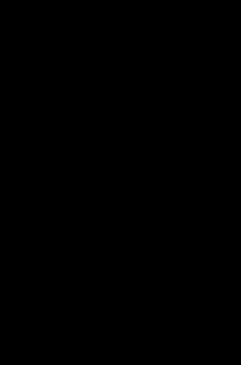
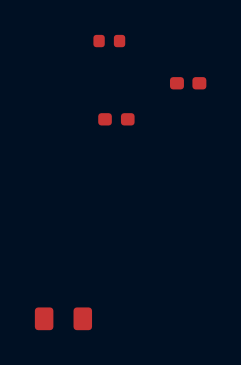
part: none -> (109, 41)
part: none -> (188, 83)
part: none -> (116, 119)
part: none -> (63, 318)

